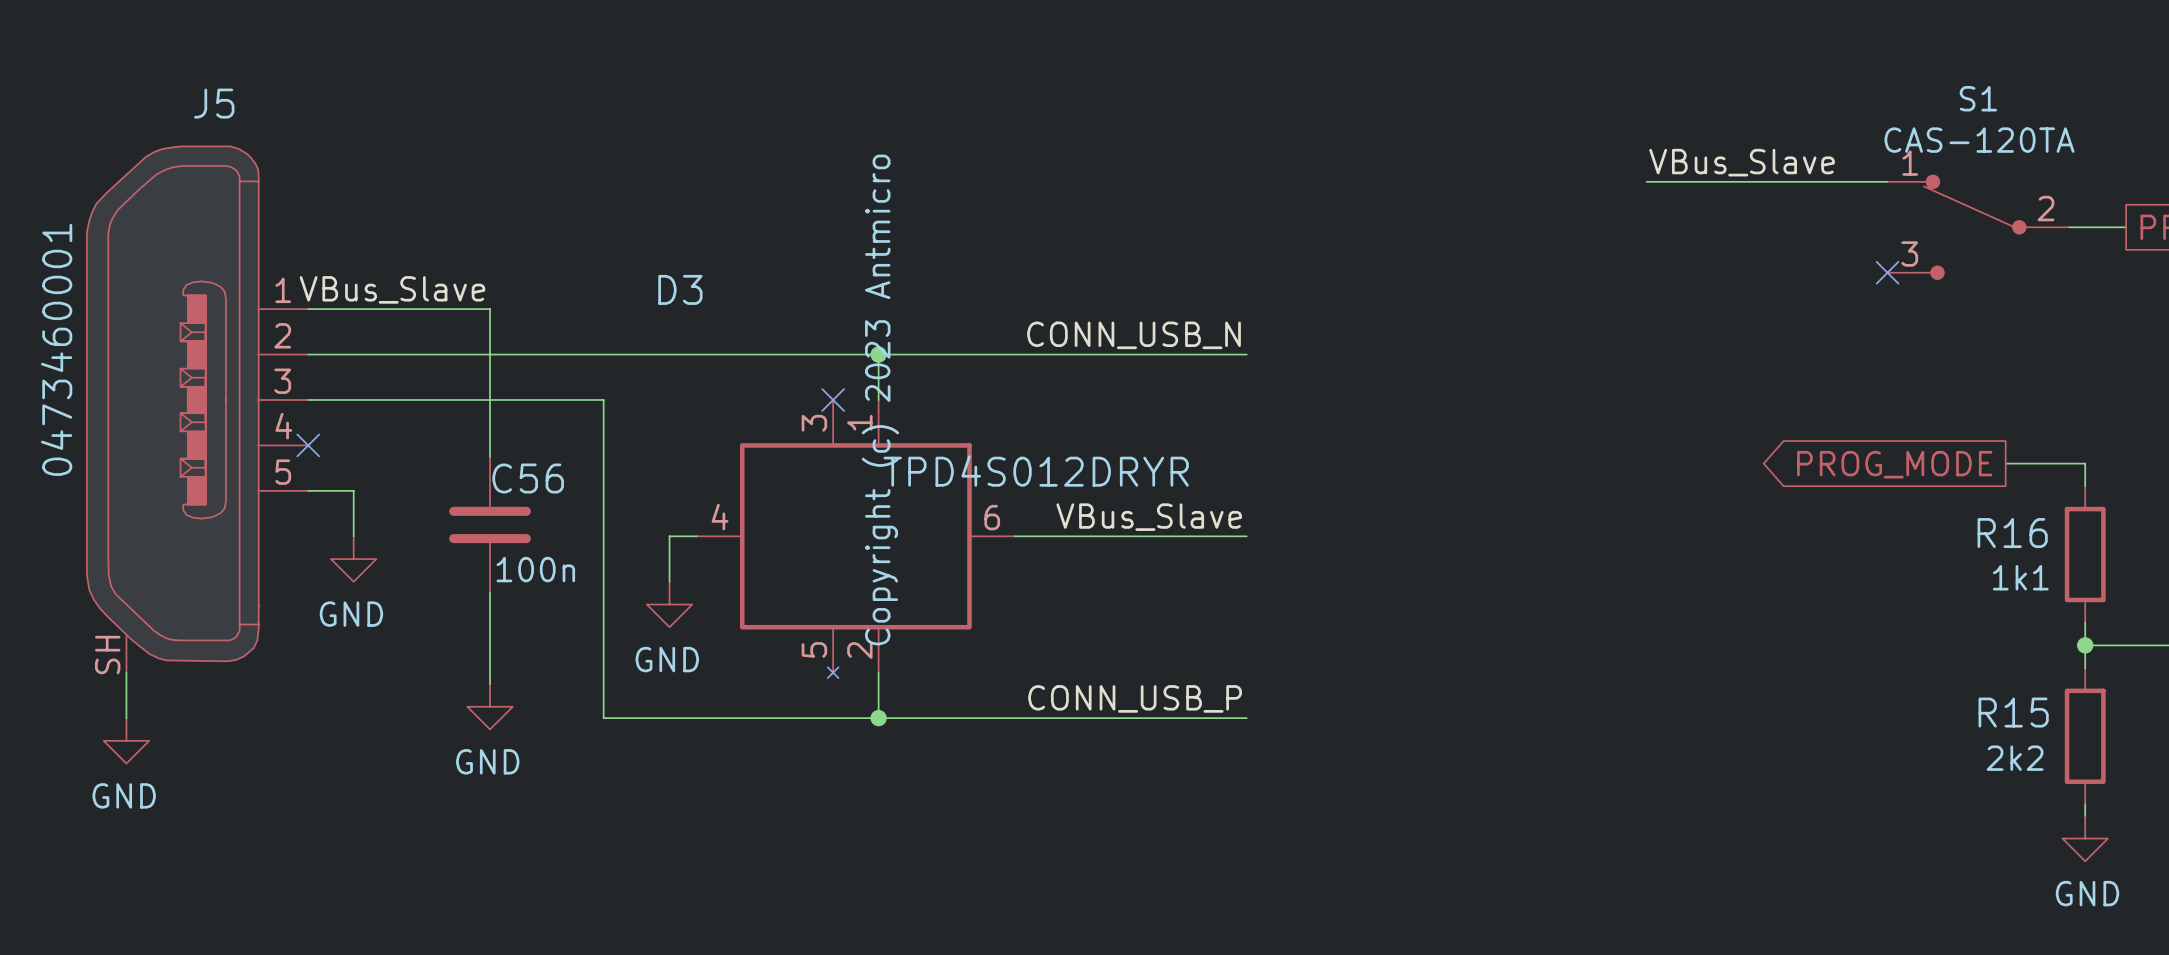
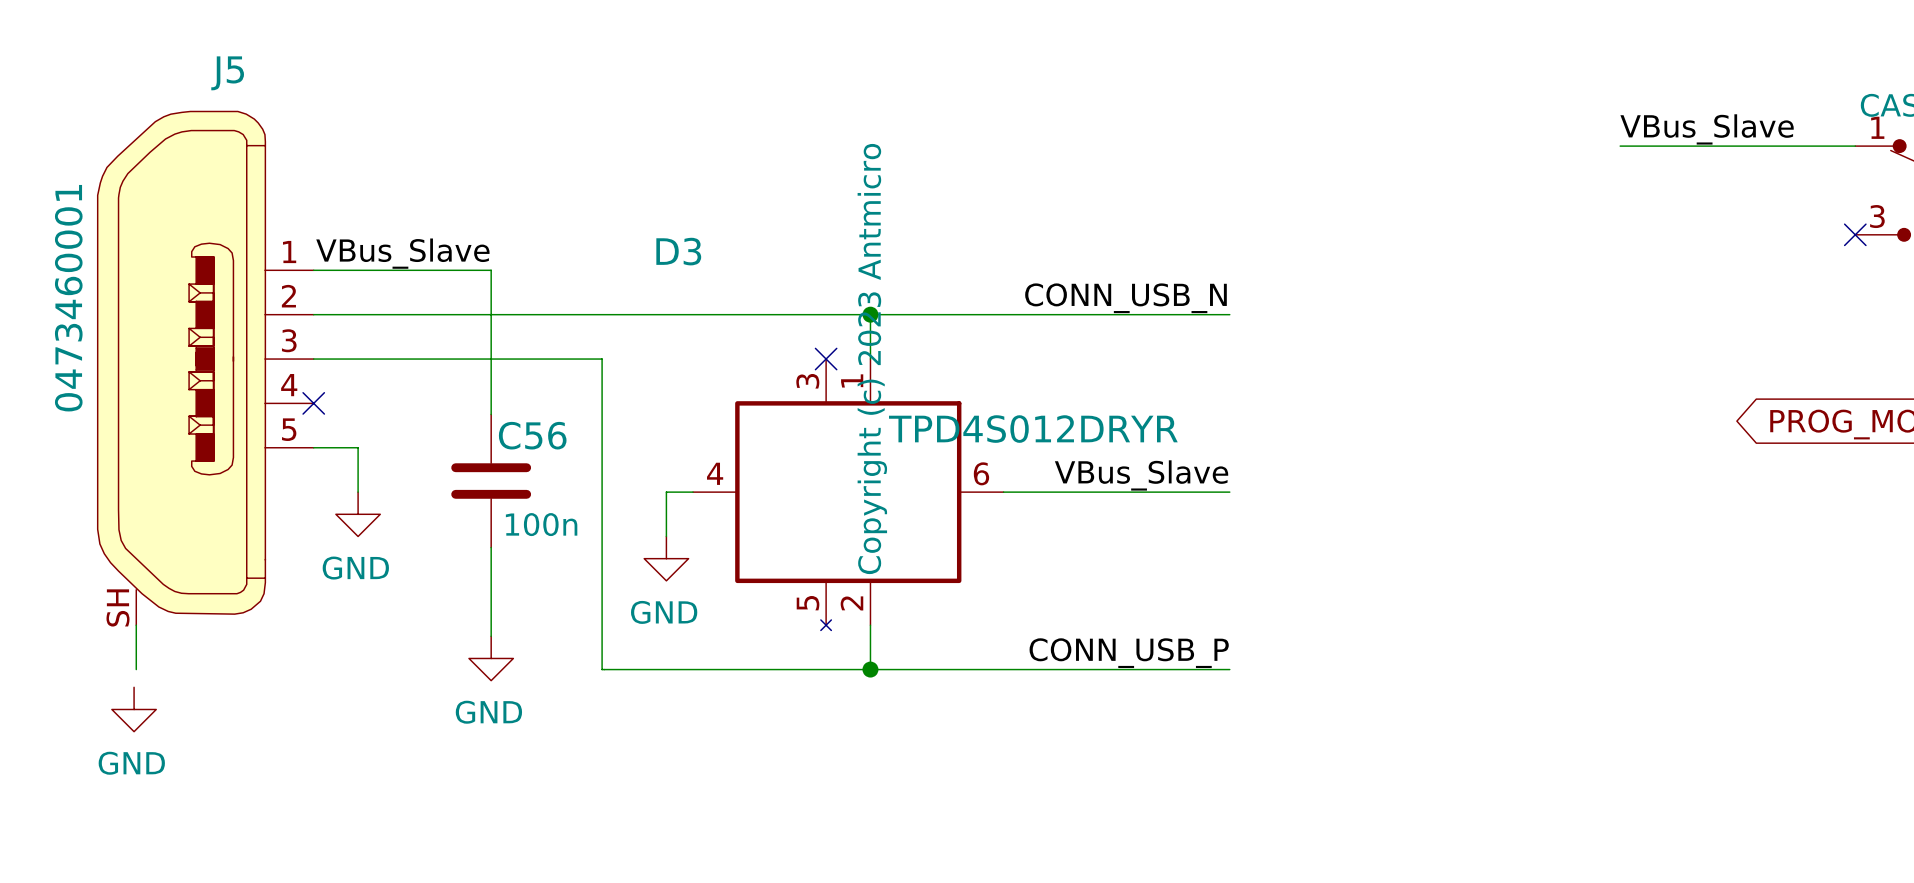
power symbol position: GND (126, 740) -> GND (134, 709)

